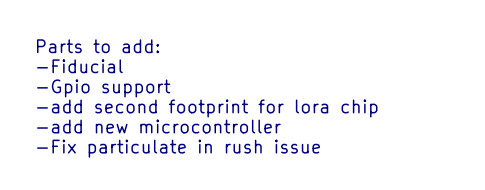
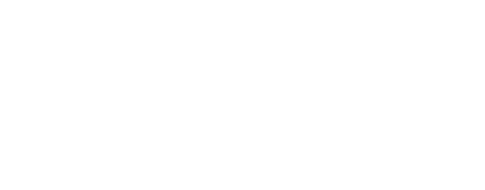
text: Parts to add: (98, 46) -> none
text: -Fiducial (79, 66) -> none
text: -Gpio support (103, 88) -> none
text: -add second footprint for lora chip (207, 108) -> none
text: -add new microcontroller (158, 126) -> none
text: -Fix particulate in rush issue (178, 148) -> none

